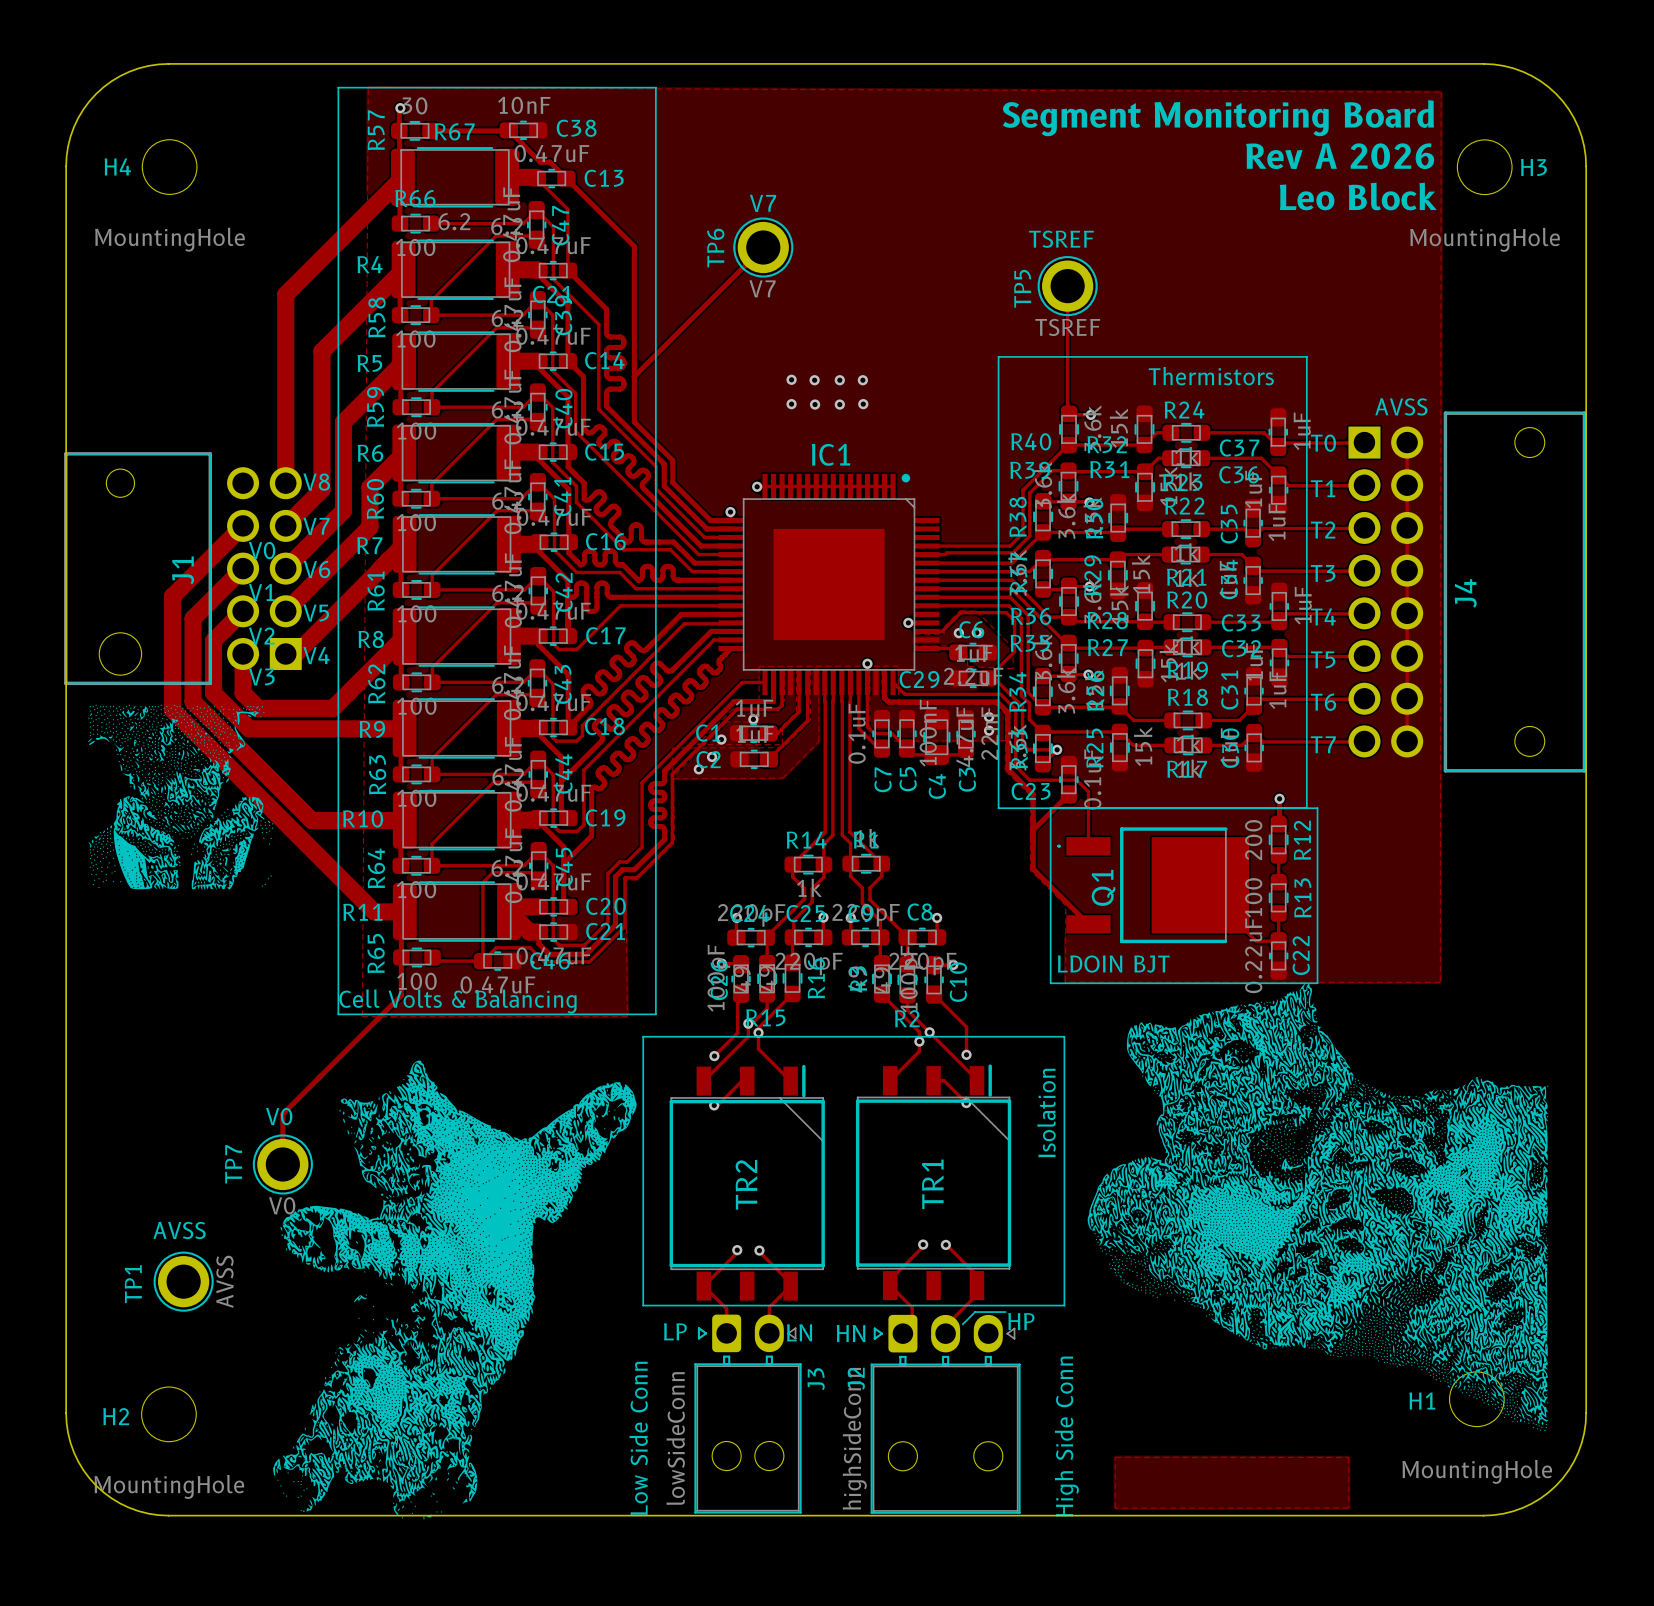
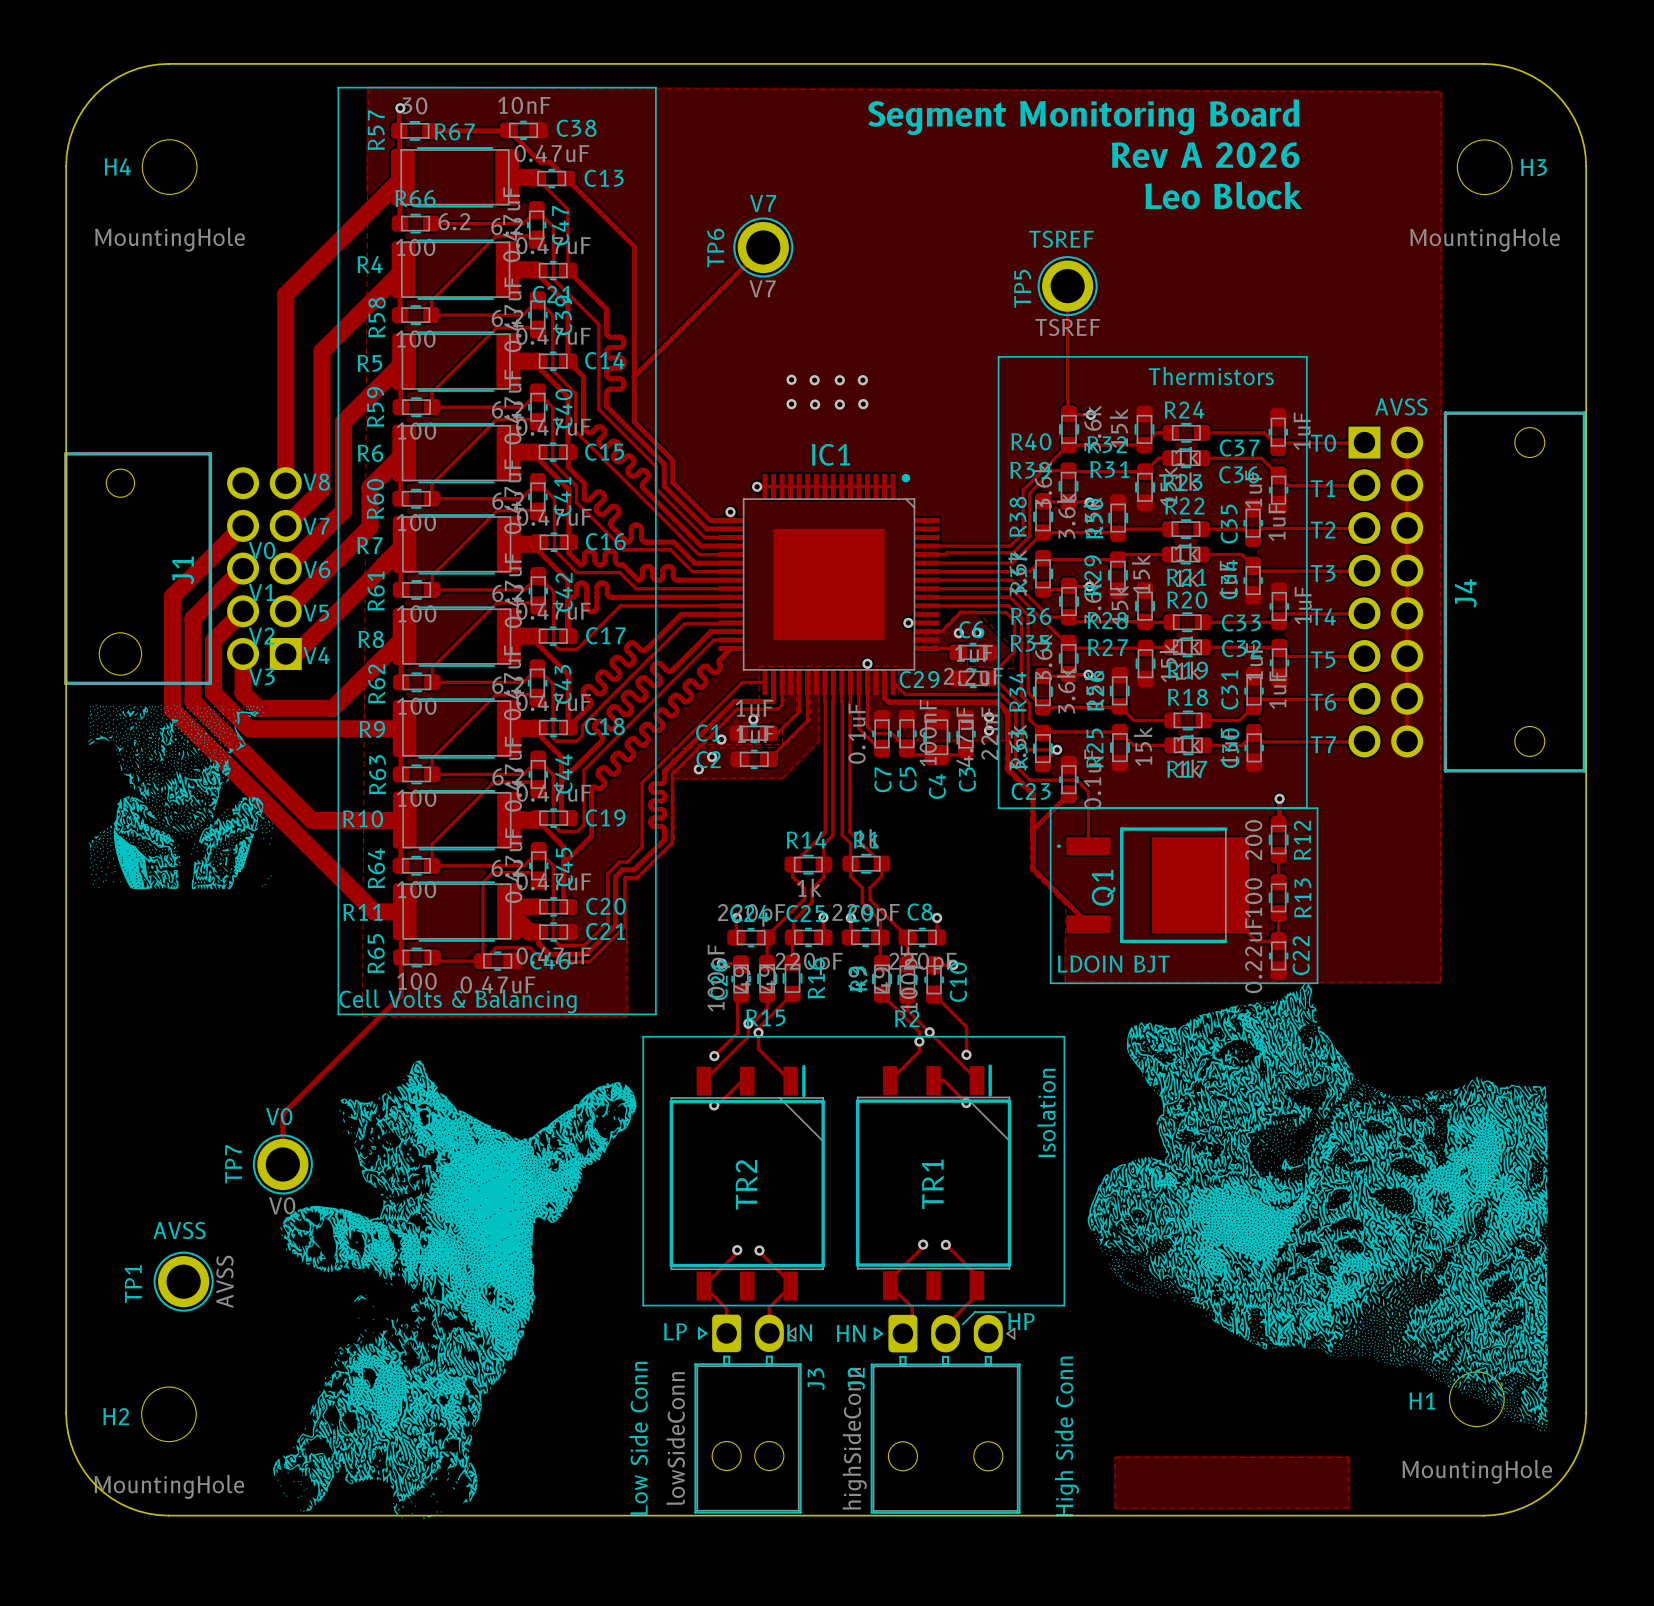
text position: Segment Monitoring Board (1218, 118) -> Segment Monitoring Board (1083, 117)
text position: Rev A 2026 (1340, 156) -> Rev A 2026 (1205, 155)
text position: Leo Block (1358, 196) -> Leo Block (1223, 195)

